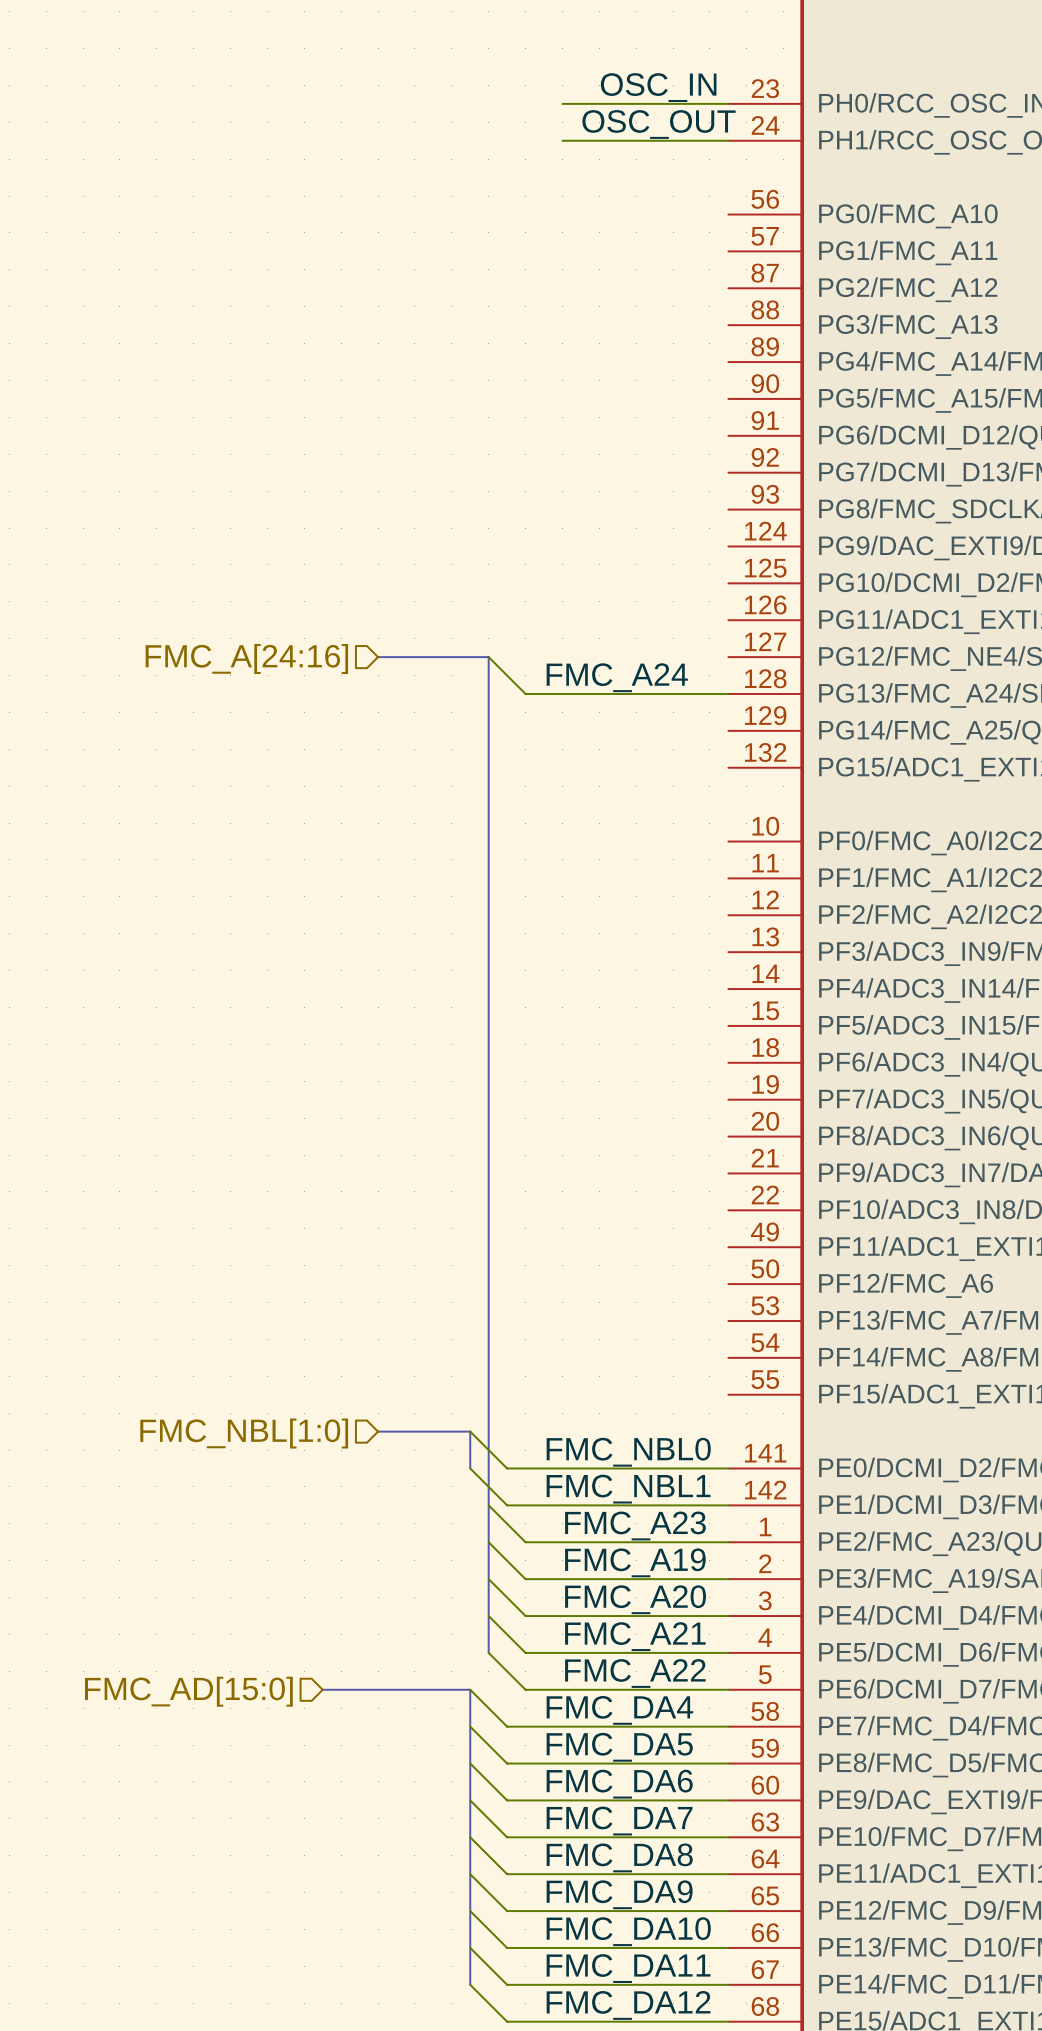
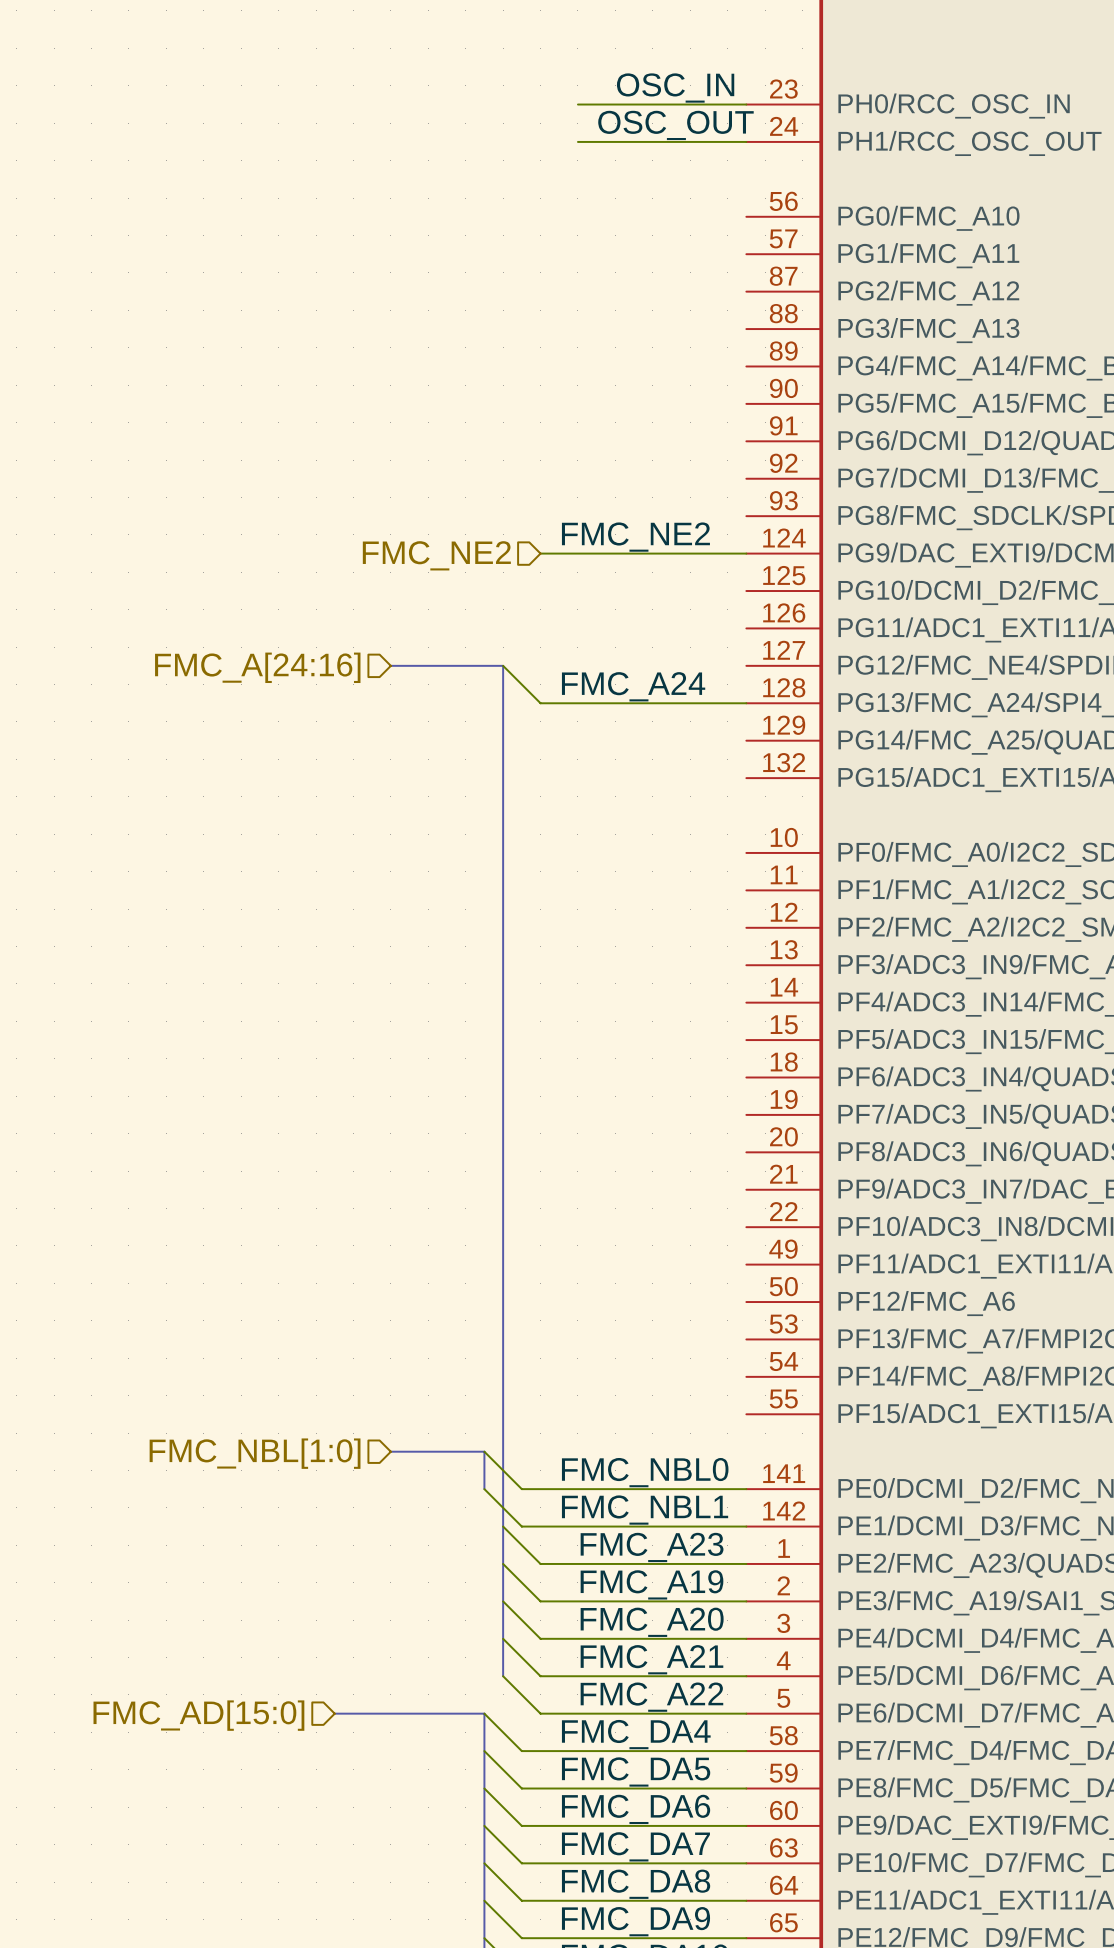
label: none -> FMC_NE2 (635, 537)
wire: none -> (540, 553) (746, 553)
hierarchical label: none -> FMC_NE2 (436, 555)

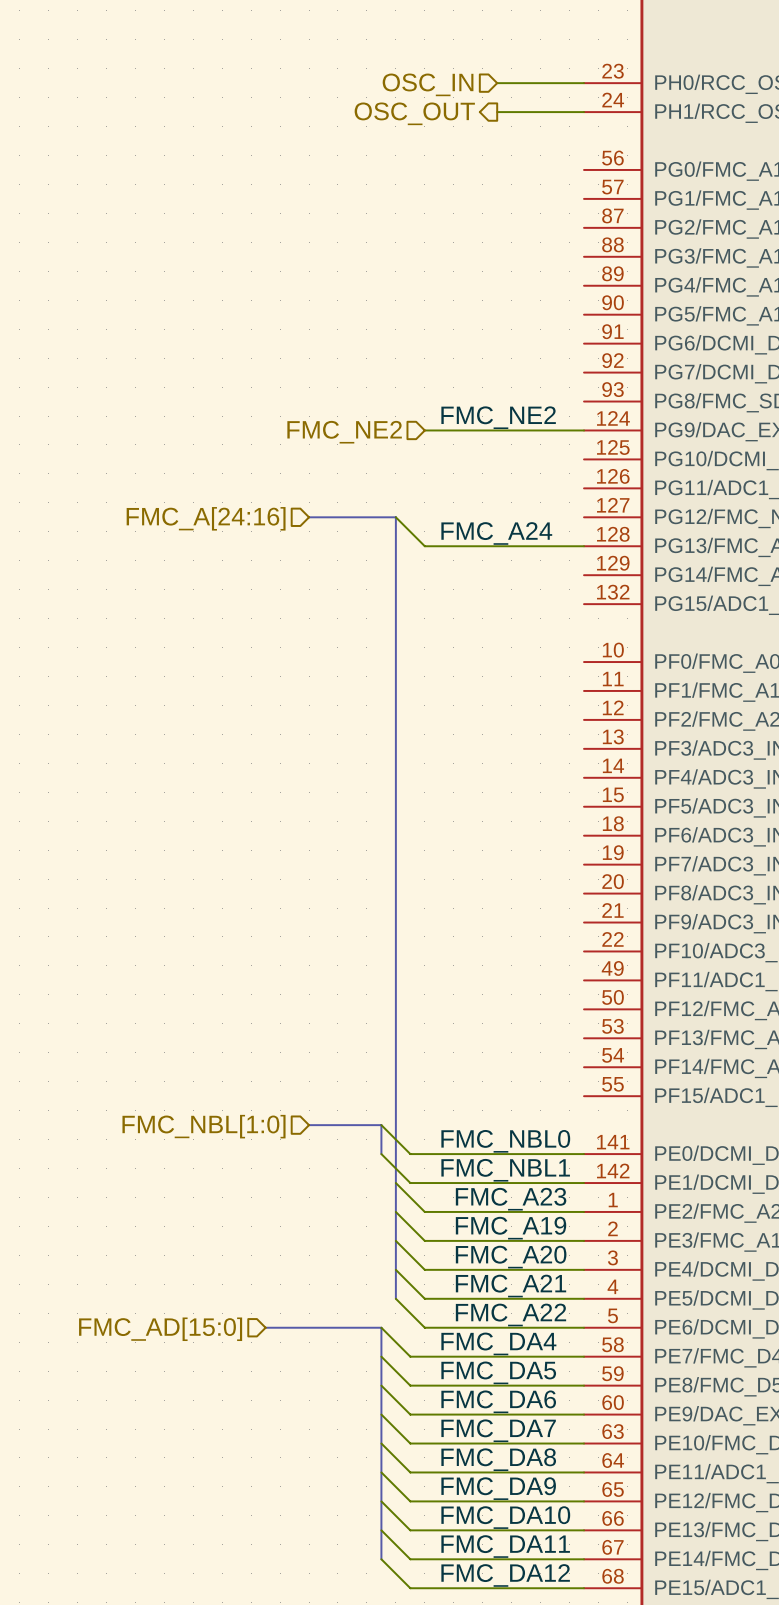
label: OSC_IN (675, 88) -> none
wire: (577, 104) (634, 104) -> none
hierarchical label: none -> OSC_IN (428, 84)
label: OSC_OUT (675, 125) -> none
wire: (577, 141) (634, 141) -> none
hierarchical label: none -> OSC_OUT (414, 113)

